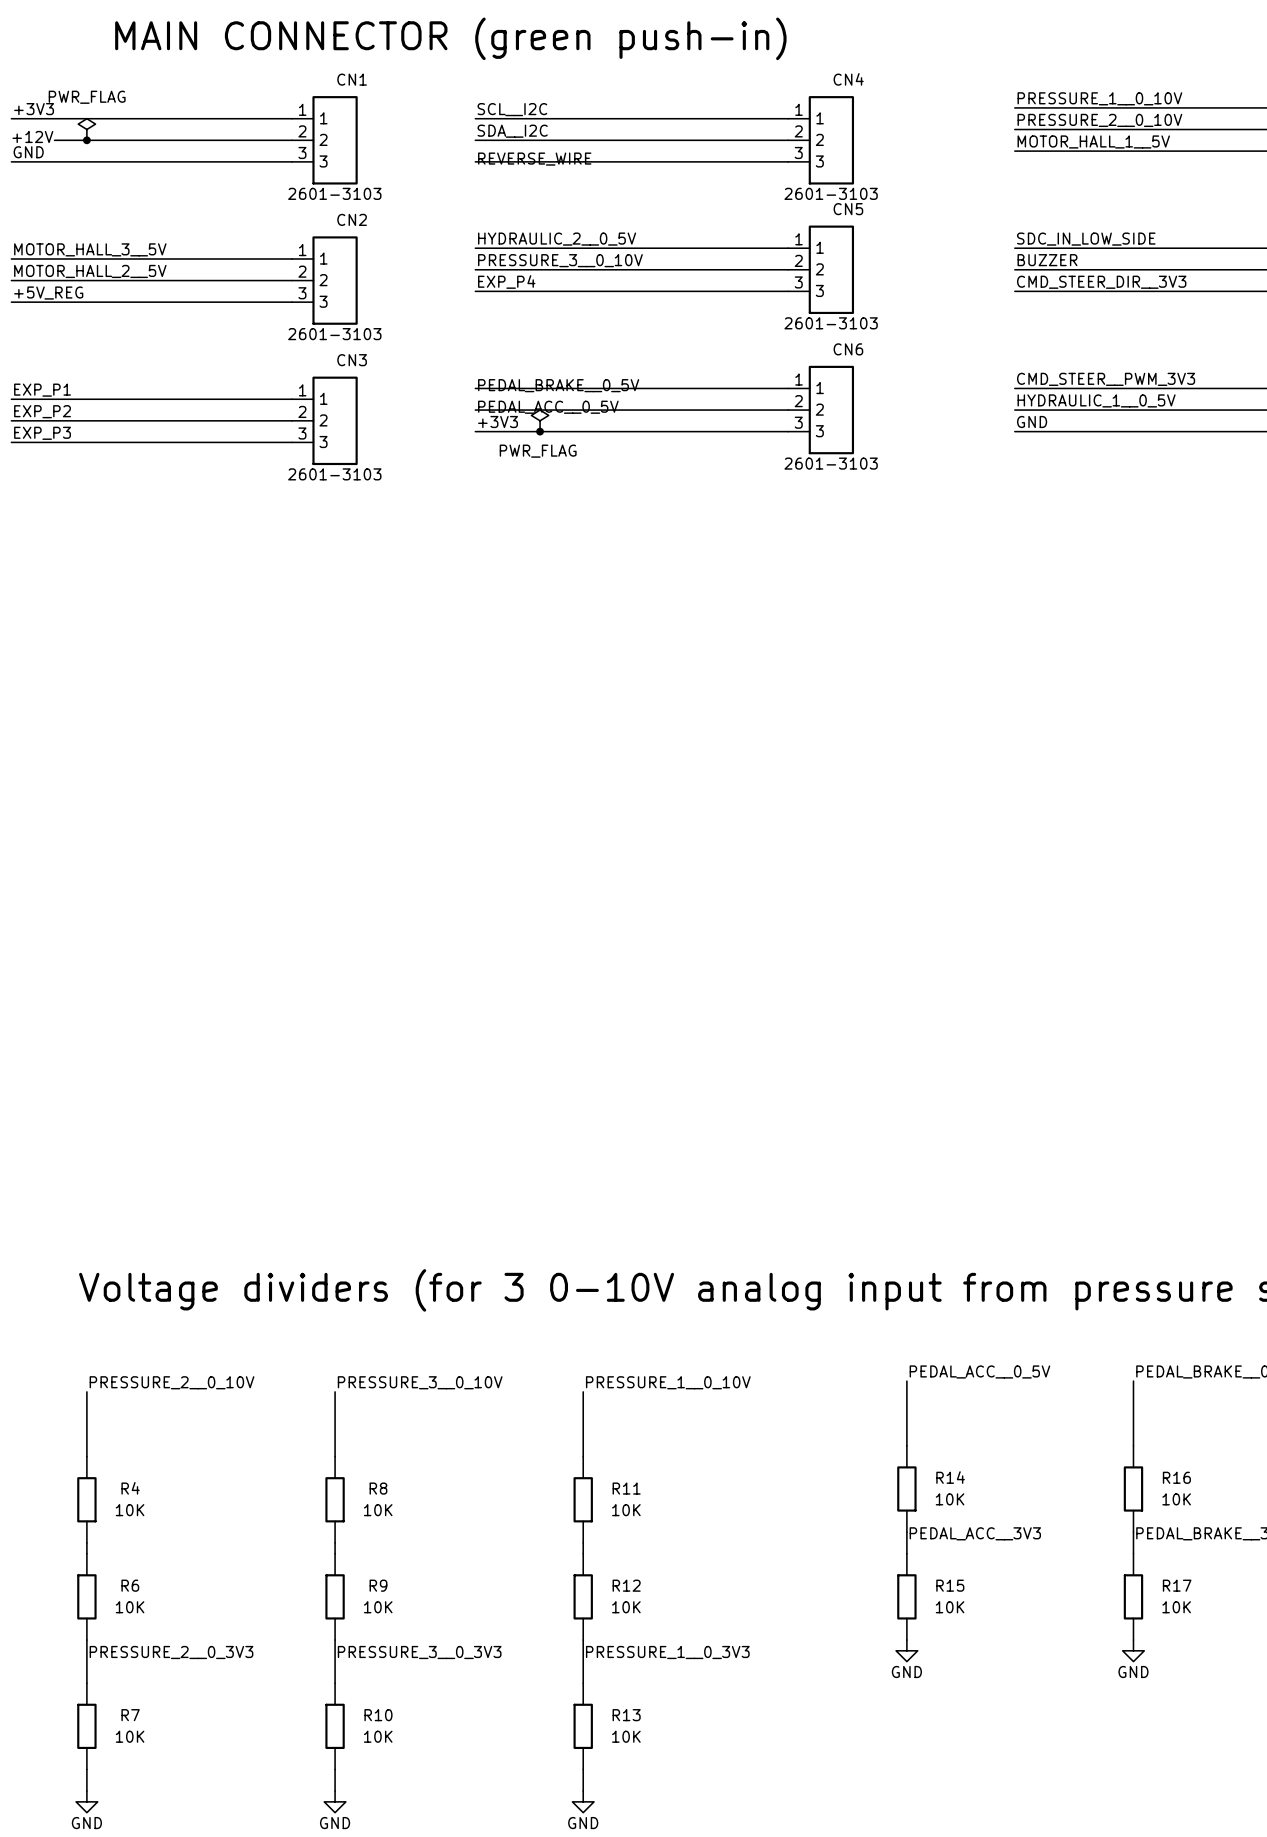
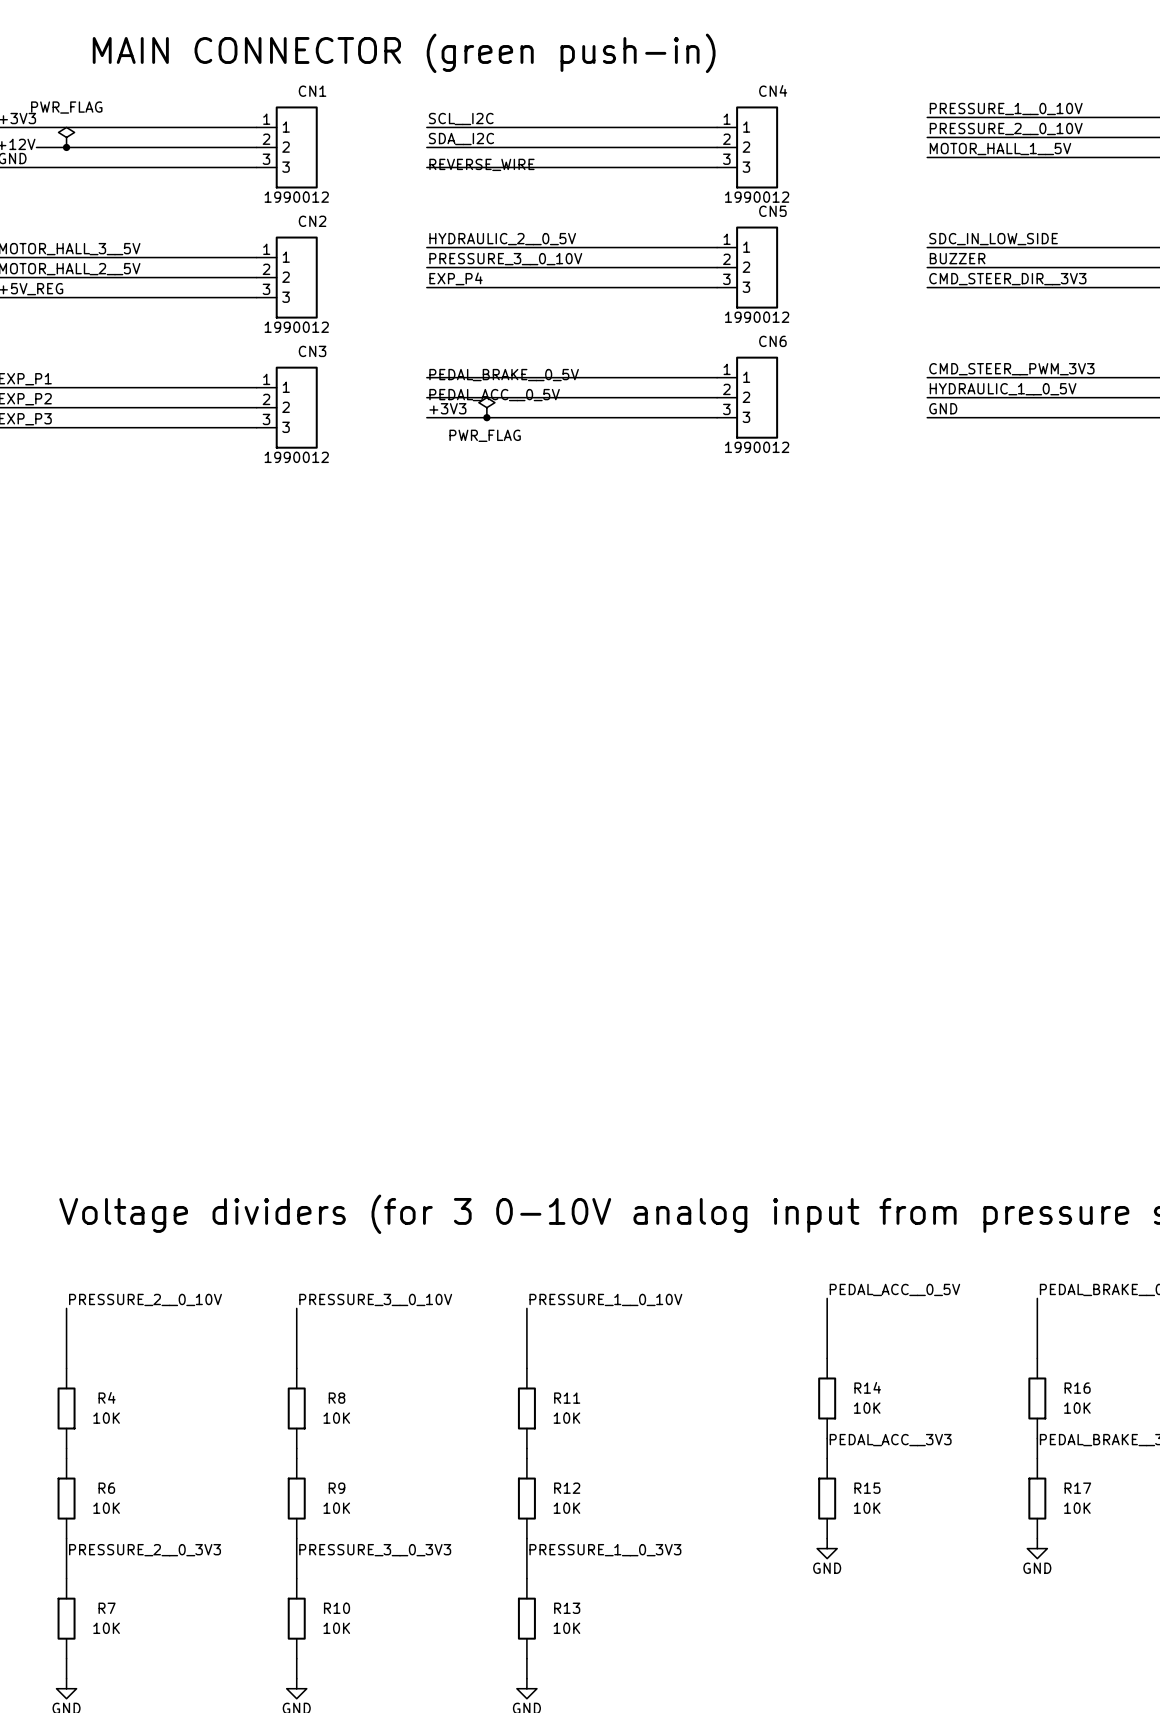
CN1 value: 2601-3103 (334, 193) -> 1990012 (296, 197)
CN4 value: 2601-3103 (831, 193) -> 1990012 (757, 197)
CN5 value: 2601-3103 (831, 323) -> 1990012 (757, 317)
CN2 value: 2601-3103 (334, 334) -> 1990012 (296, 327)
CN6 value: 2601-3103 (831, 463) -> 1990012 (757, 447)
CN3 value: 2601-3103 (334, 474) -> 1990012 (296, 457)

